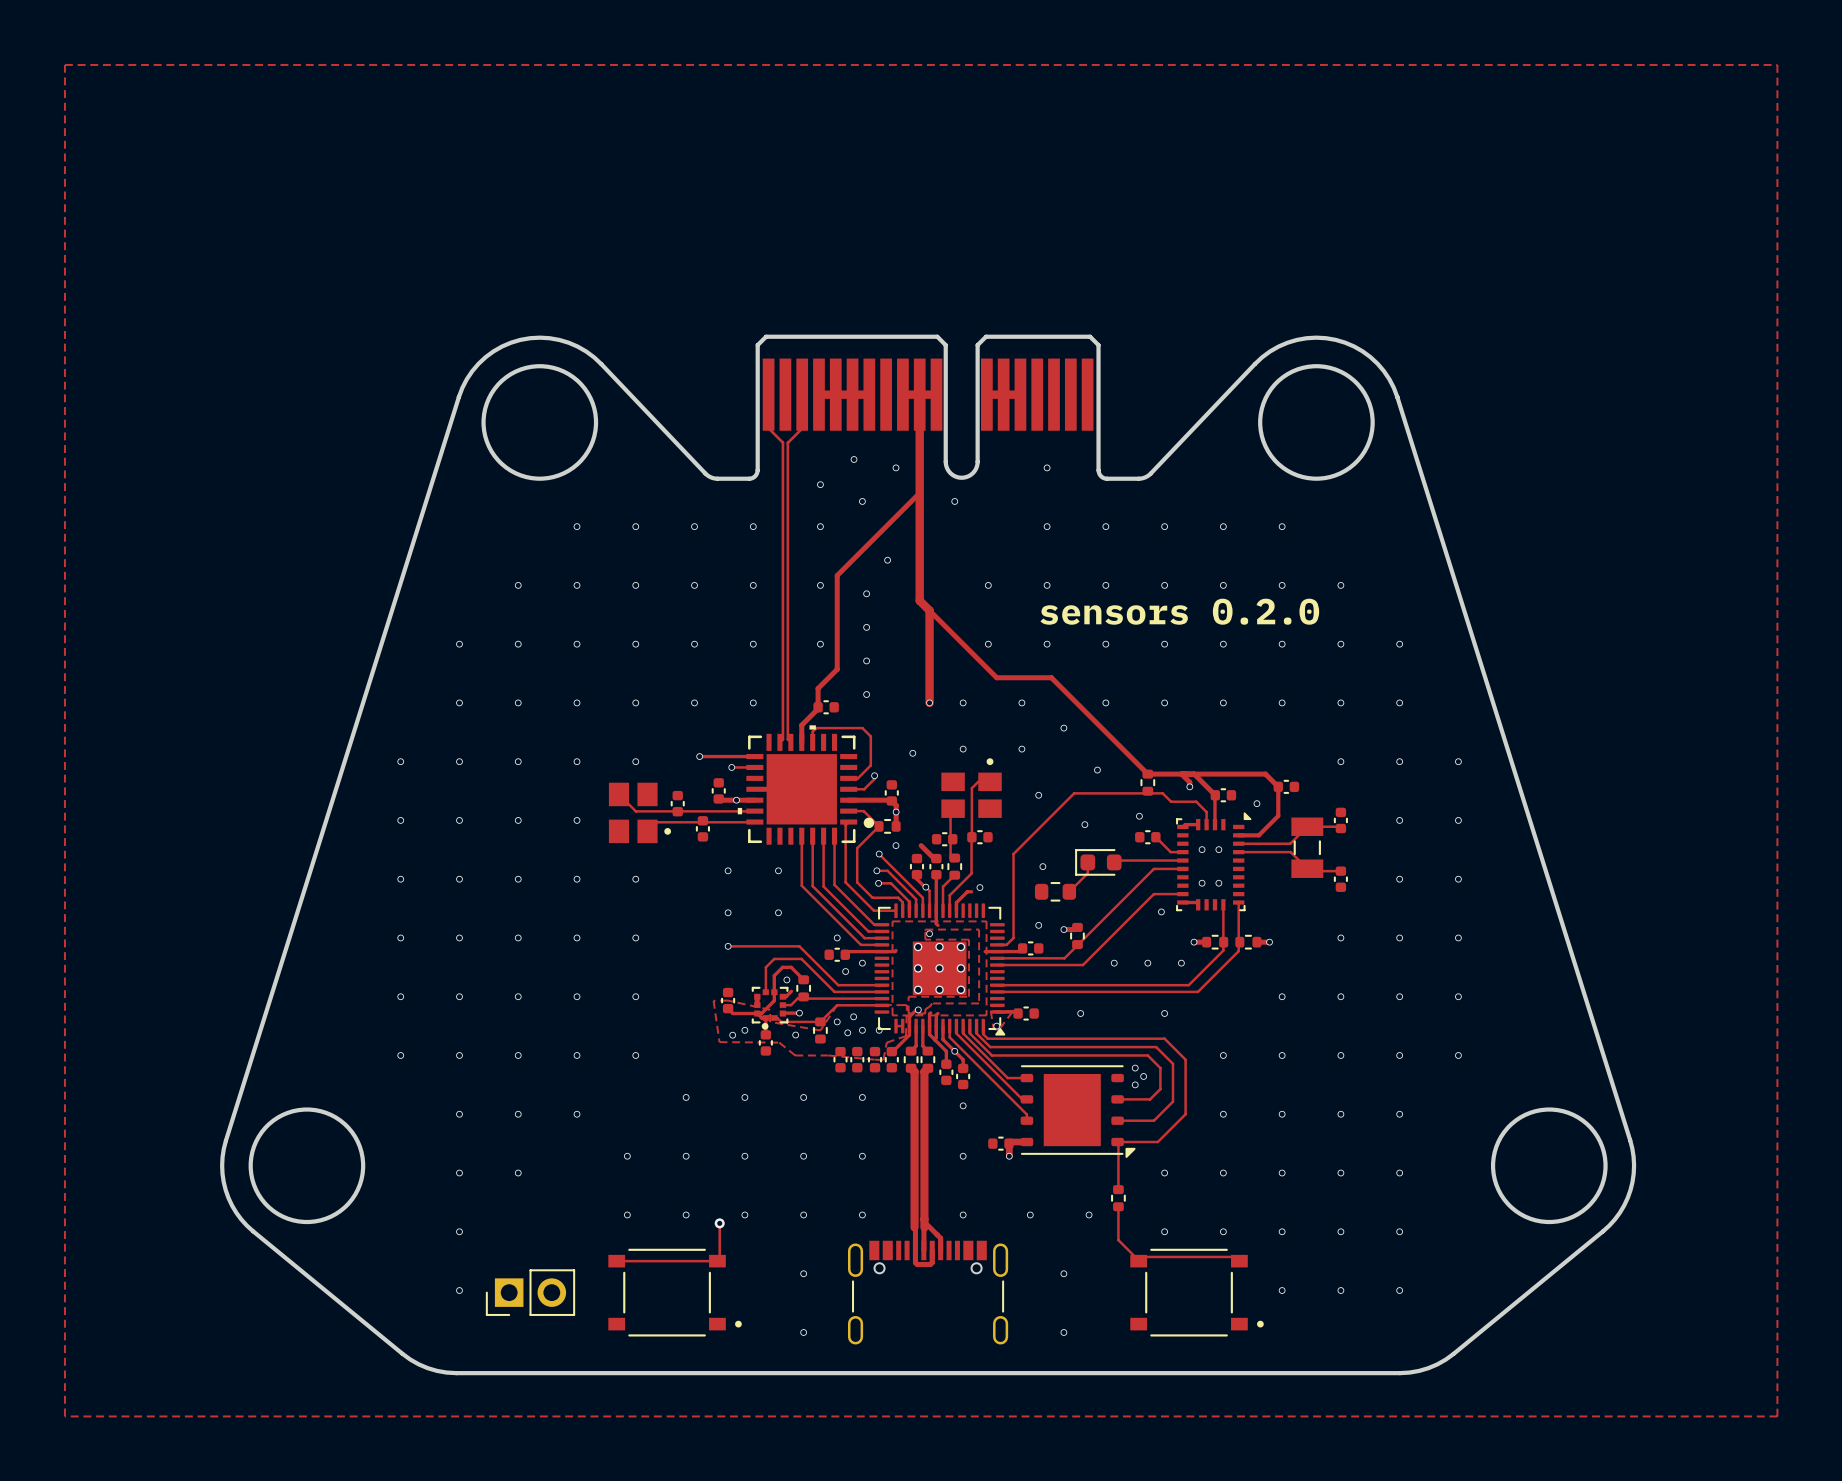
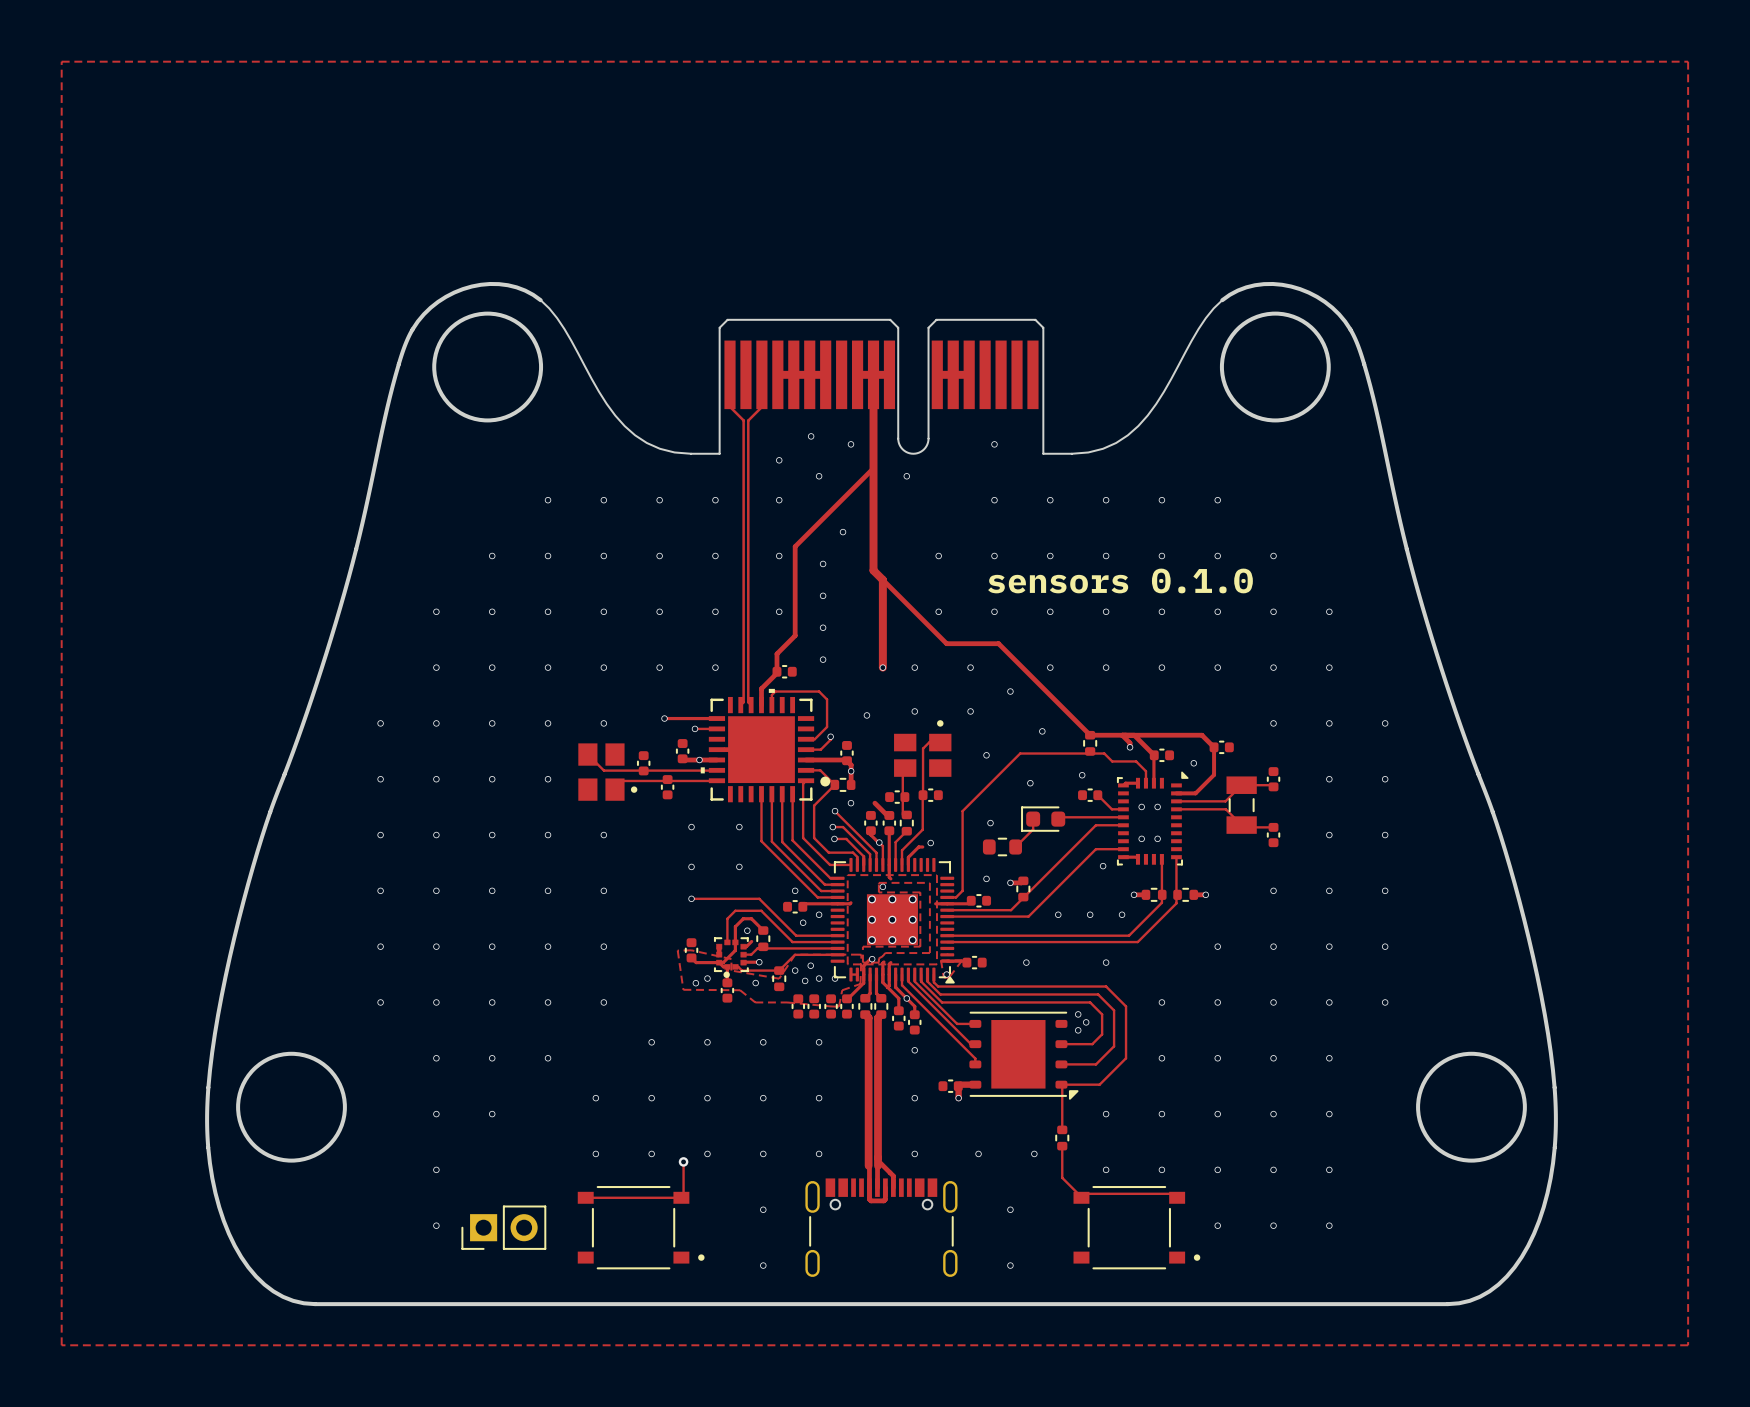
part footprint: [755, 334, 1101, 480] -> [718, 319, 1045, 455]
round board edge position: (539, 422) -> (487, 367)
round board edge position: (1316, 422) -> (1275, 367)
board edge: (757, 470) (755, 476) (750, 478) (715, 478) (707, 475) (594, 357) (577, 346) (559, 339) (539, 337) (520, 339) (493, 351) (472, 371) (458, 397) (225, 1140) (222, 1165) (223, 1182) (228, 1198) (241, 1219) (253, 1231) (410, 1359) (427, 1368) (456, 1373) -> (719, 453) (674, 452) (659, 448) (635, 435) (624, 426) (606, 404) (557, 318) (540, 300) (516, 287) (499, 284) (480, 284) (462, 289) (445, 296) (430, 307) (417, 321) (402, 353) (387, 407) (359, 535) (340, 607) (307, 712) (266, 823) (238, 919) (214, 1033) (208, 1087) (207, 1129) (212, 1178) (223, 1220) (241, 1257) (264, 1284) (283, 1296) (303, 1303) (433, 1304)
board edge: (1098, 470) (1100, 475) (1105, 478) (1140, 478) (1148, 475) (1262, 357) (1278, 346) (1296, 339) (1325, 338) (1354, 346) (1377, 363) (1389, 379) (1397, 397) (1630, 1140) (1634, 1165) (1630, 1190) (1624, 1205) (1614, 1219) (1603, 1231) (1445, 1359) (1419, 1370) (1399, 1373) -> (1043, 453) (1088, 452) (1103, 448) (1127, 435) (1138, 426) (1156, 404) (1205, 318) (1222, 300) (1246, 287) (1263, 284) (1282, 284) (1300, 289) (1317, 296) (1332, 307) (1345, 321) (1360, 353) (1375, 407) (1403, 535) (1422, 607) (1455, 712) (1496, 823) (1524, 919) (1548, 1033) (1554, 1087) (1555, 1129) (1550, 1178) (1539, 1220) (1521, 1257) (1498, 1284) (1479, 1296) (1459, 1303) (1329, 1304)
text: sensors 0.2.0 (1179, 611) -> sensors 0.1.0 (1120, 580)

